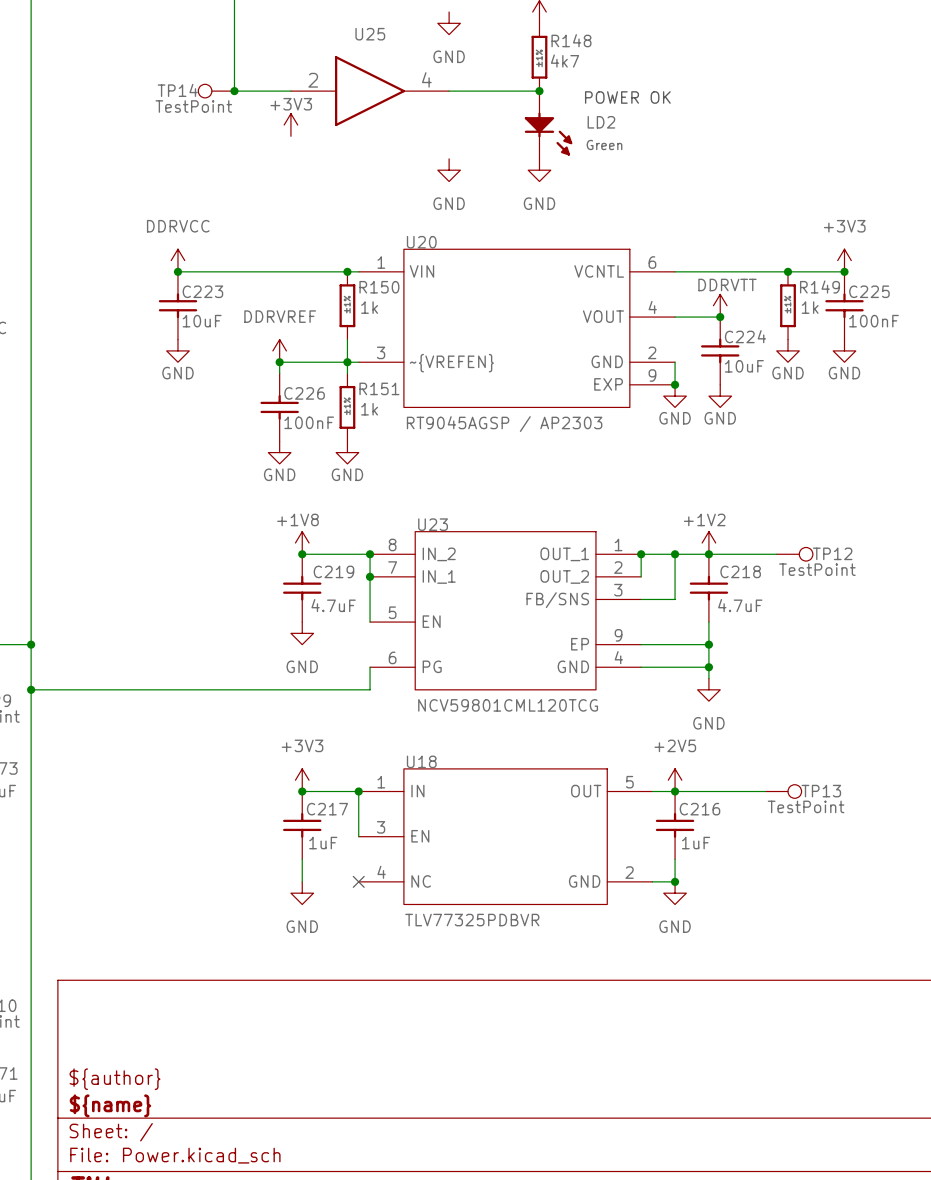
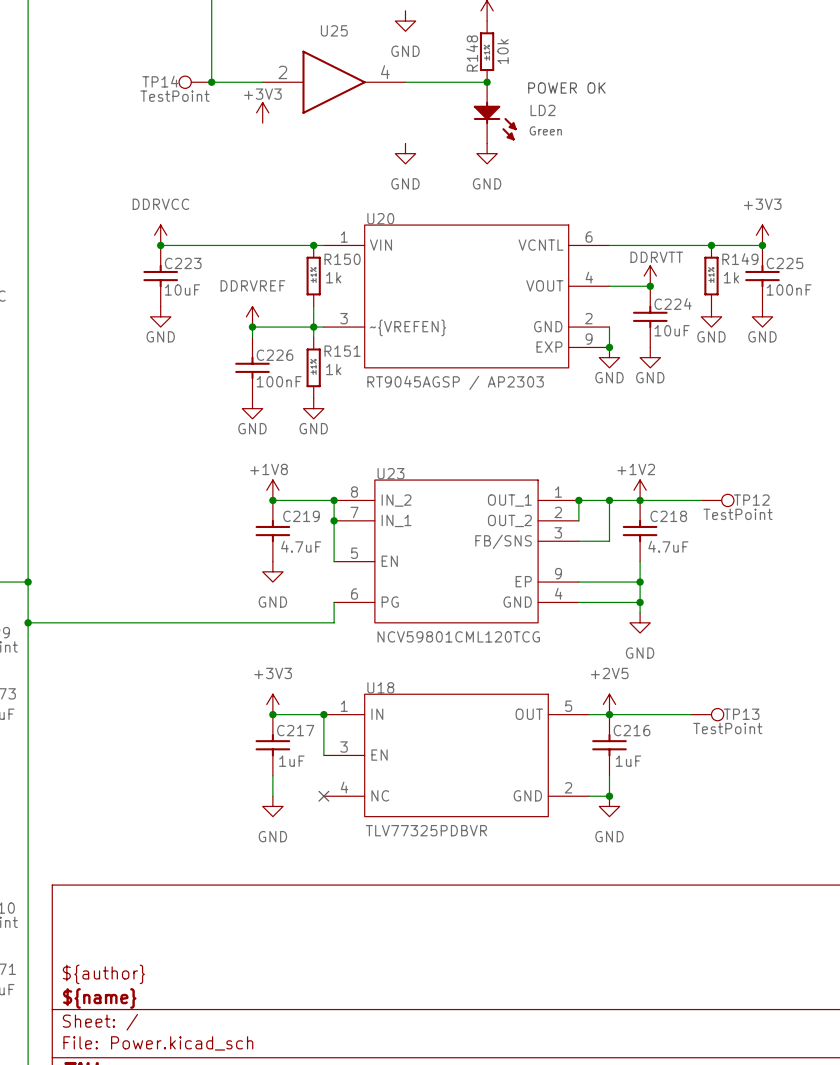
R148 name rotation: 0° (571, 40) -> 90° counterclockwise (472, 53)
R148 name position: R148 (571, 40) -> R148 (472, 53)
R148 text: 4k7 (565, 61) -> 10k (503, 51)

